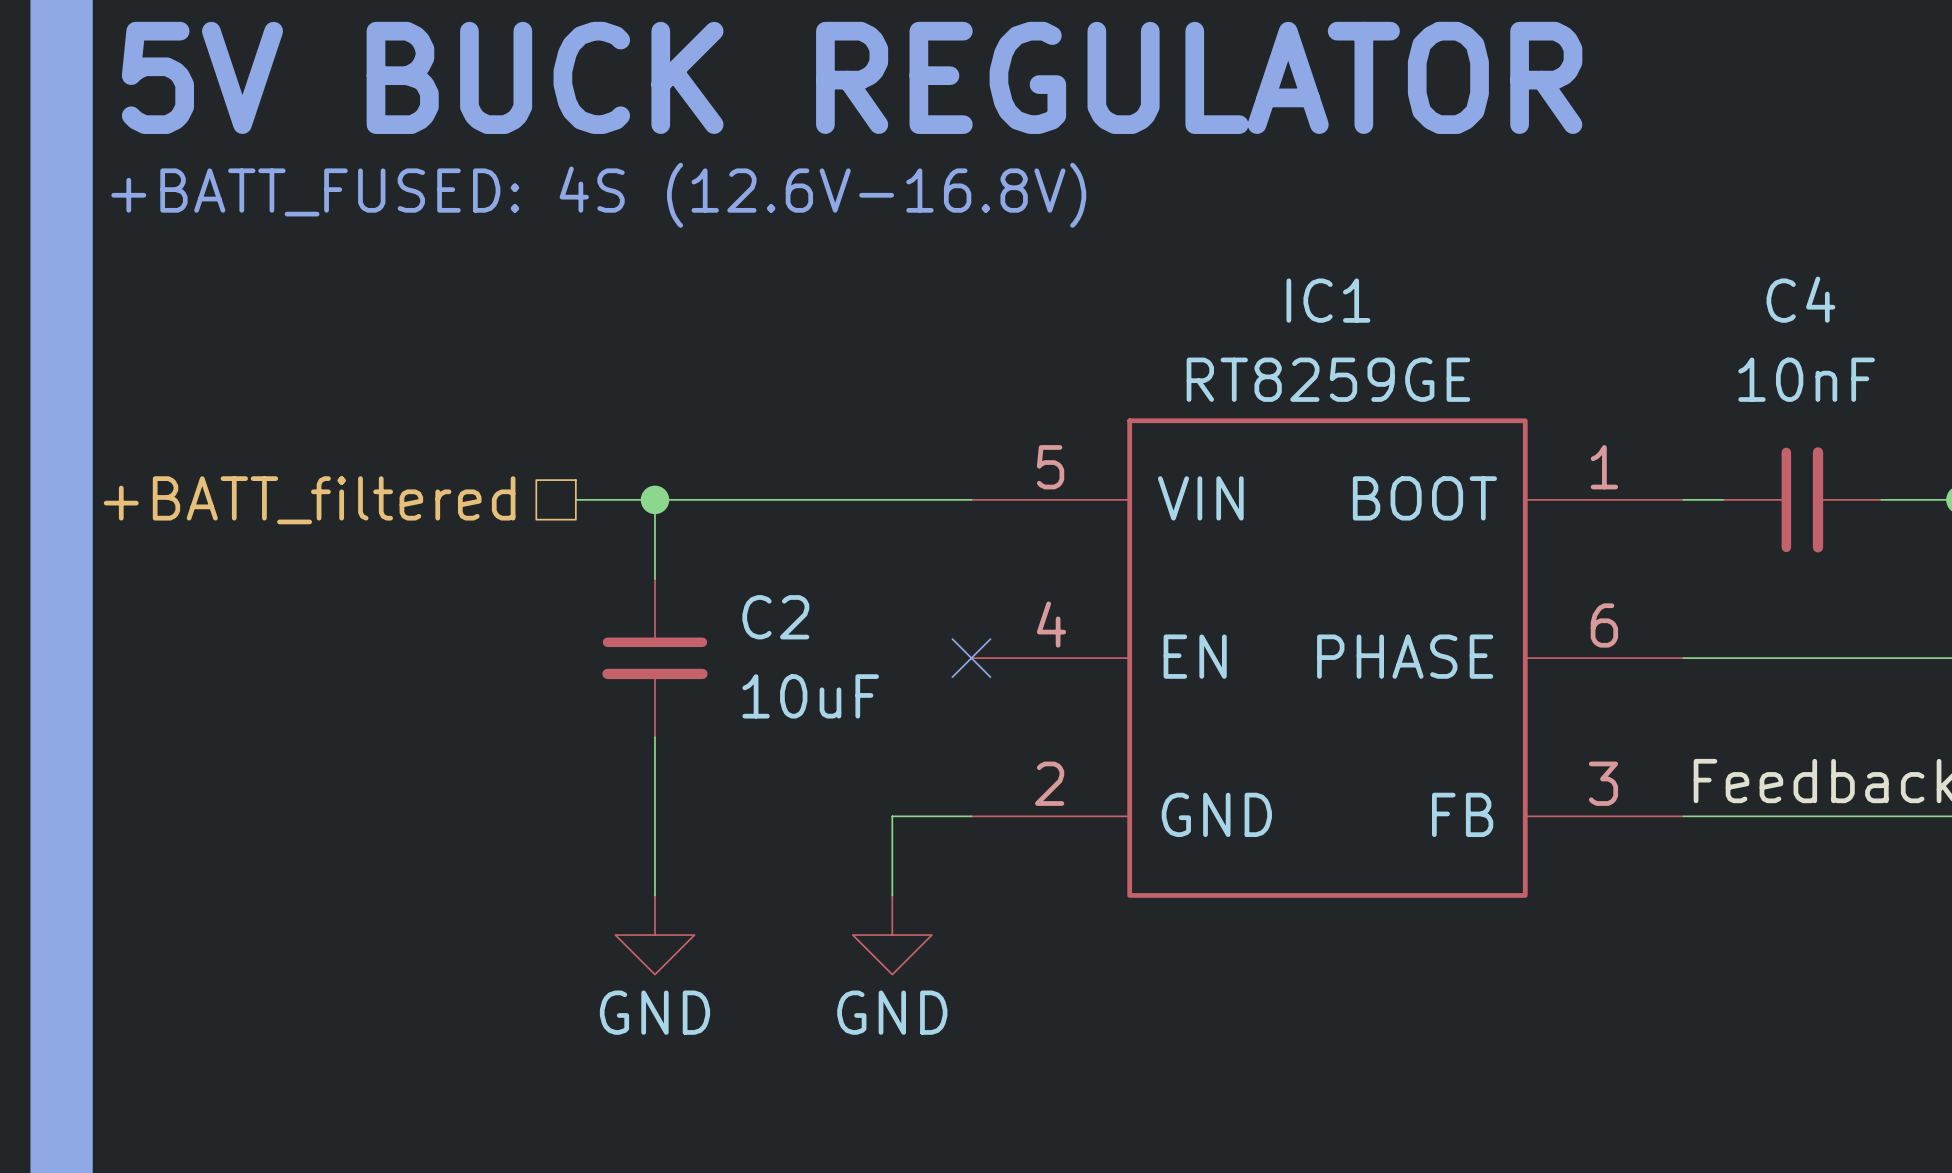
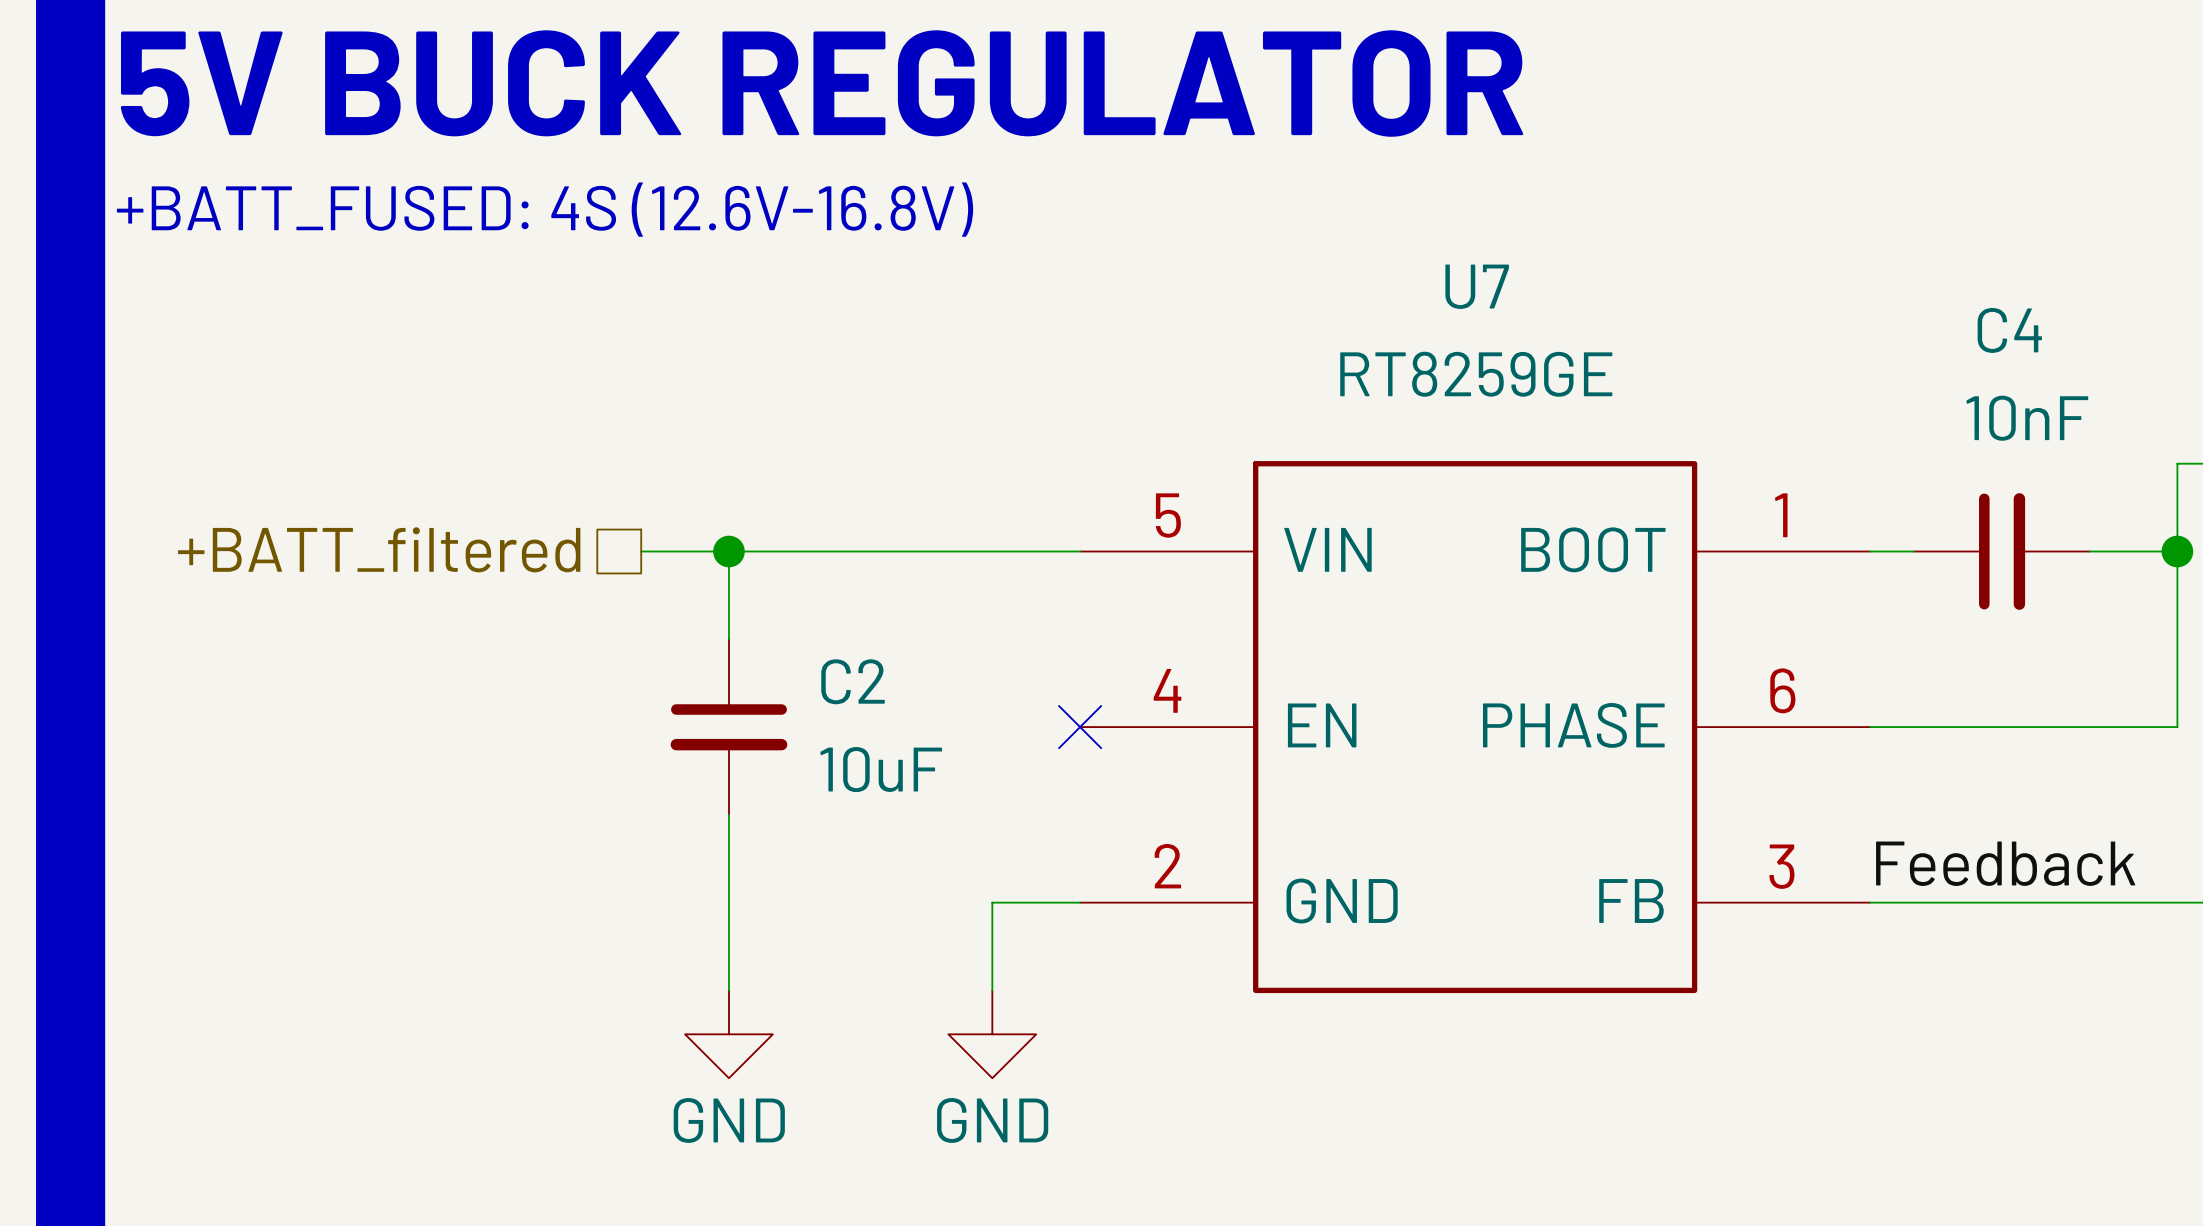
IC1 name: IC1 (1328, 300) -> U7 (1477, 286)
IC1 value position: RT8259GE (1328, 379) -> RT8259GE (1476, 374)

